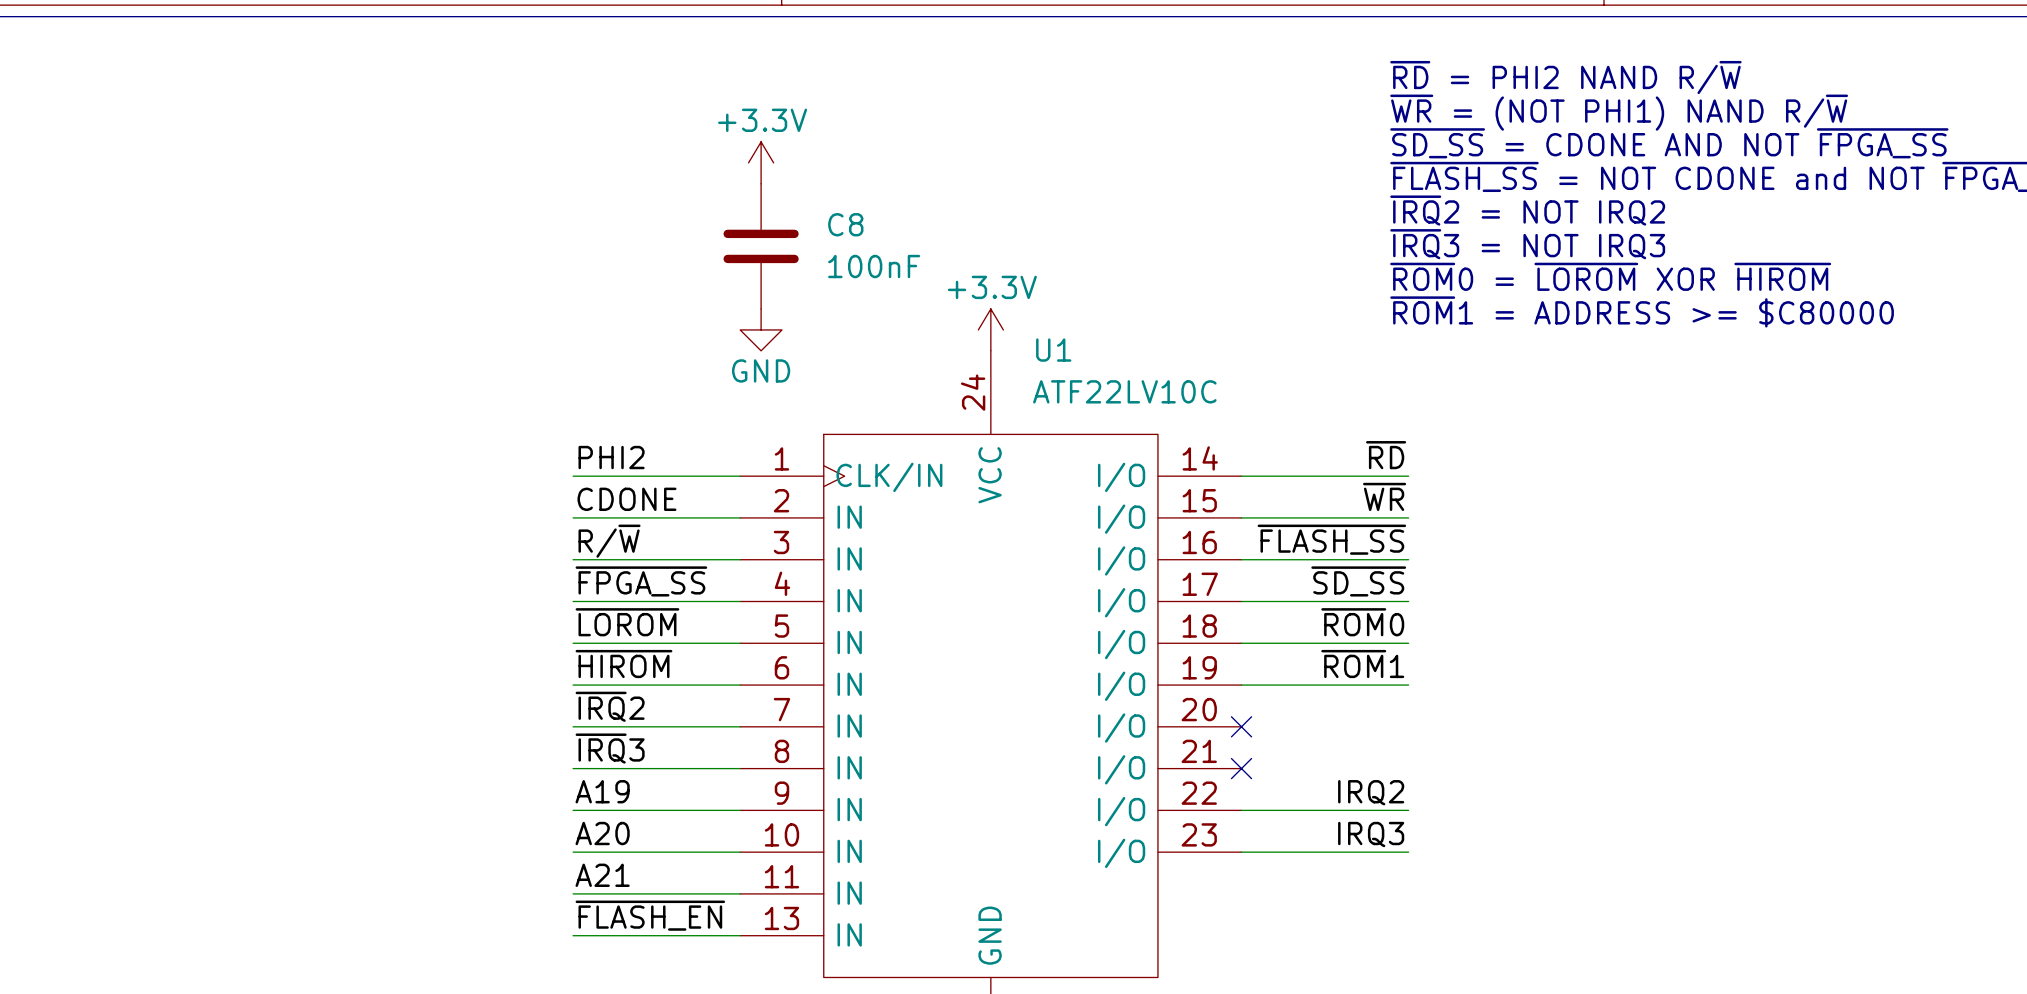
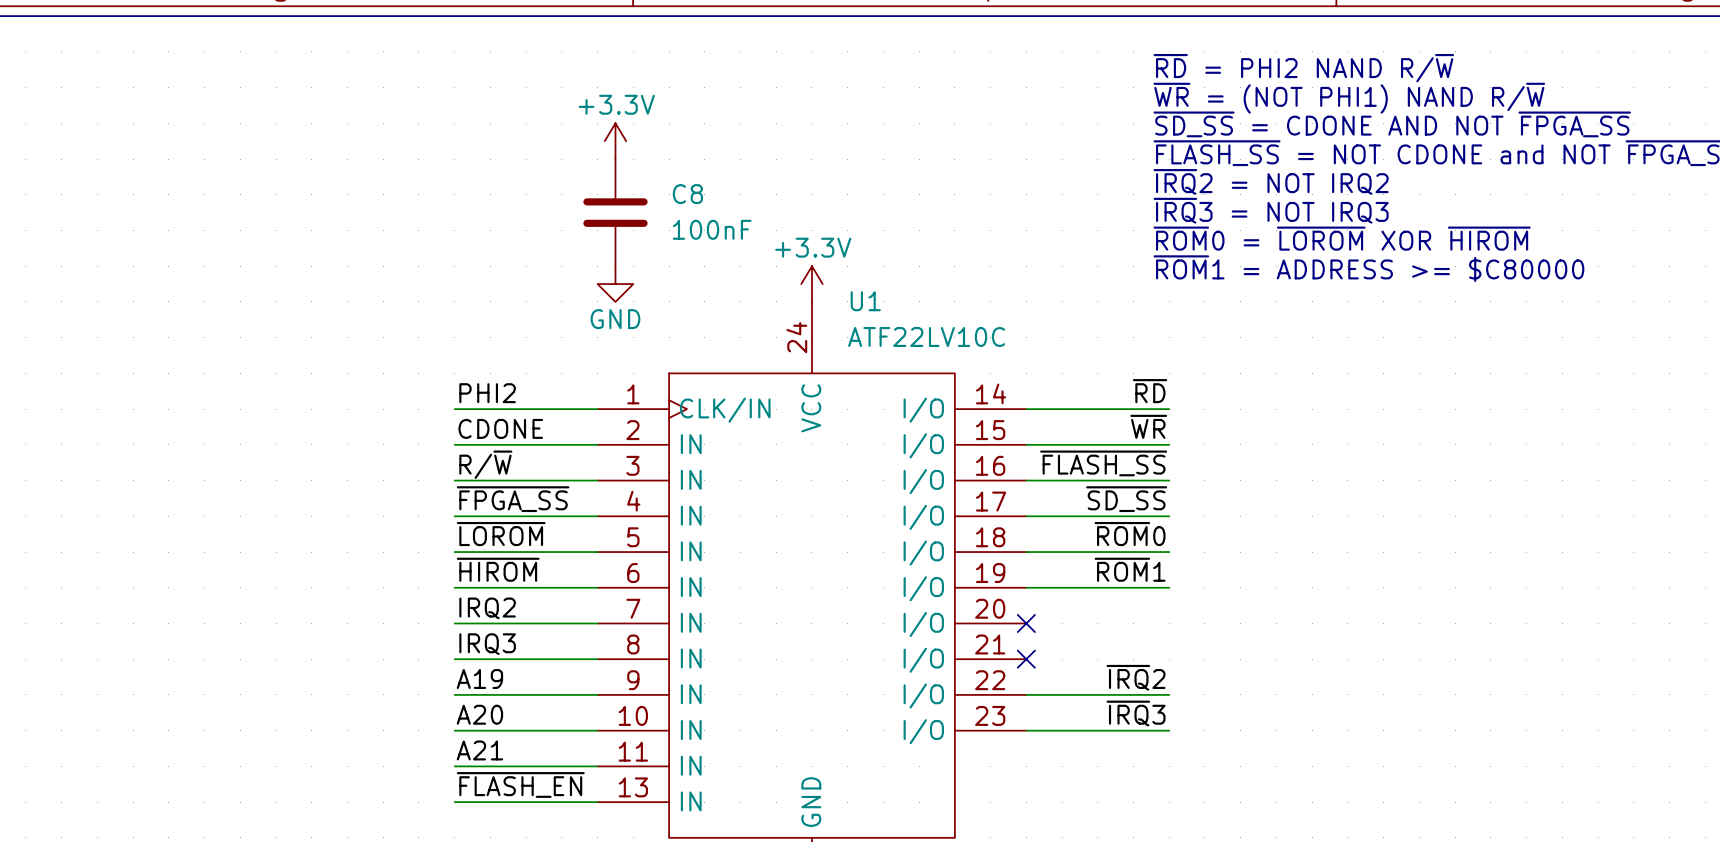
label: ~{IRQ}2 (610, 706) -> IRQ2 (487, 608)
label: ~{IRQ}3 (610, 748) -> IRQ3 (487, 644)
label: IRQ2 (1371, 792) -> ~{IRQ}2 (1136, 677)
label: IRQ3 (1371, 834) -> ~{IRQ}3 (1136, 713)

